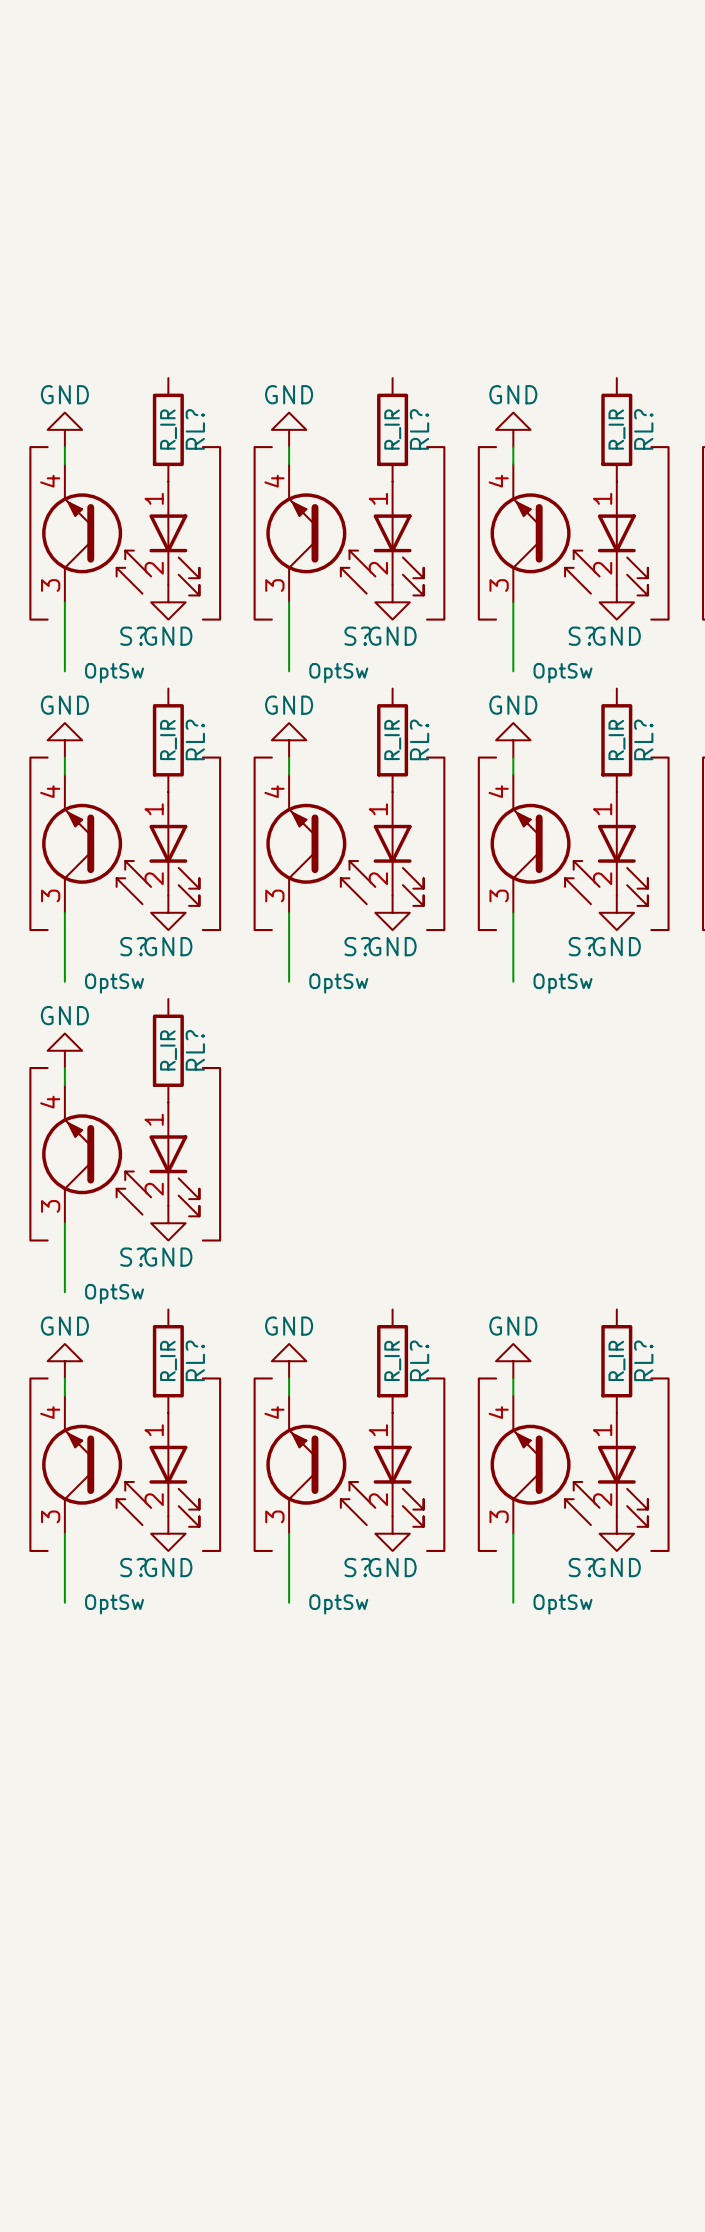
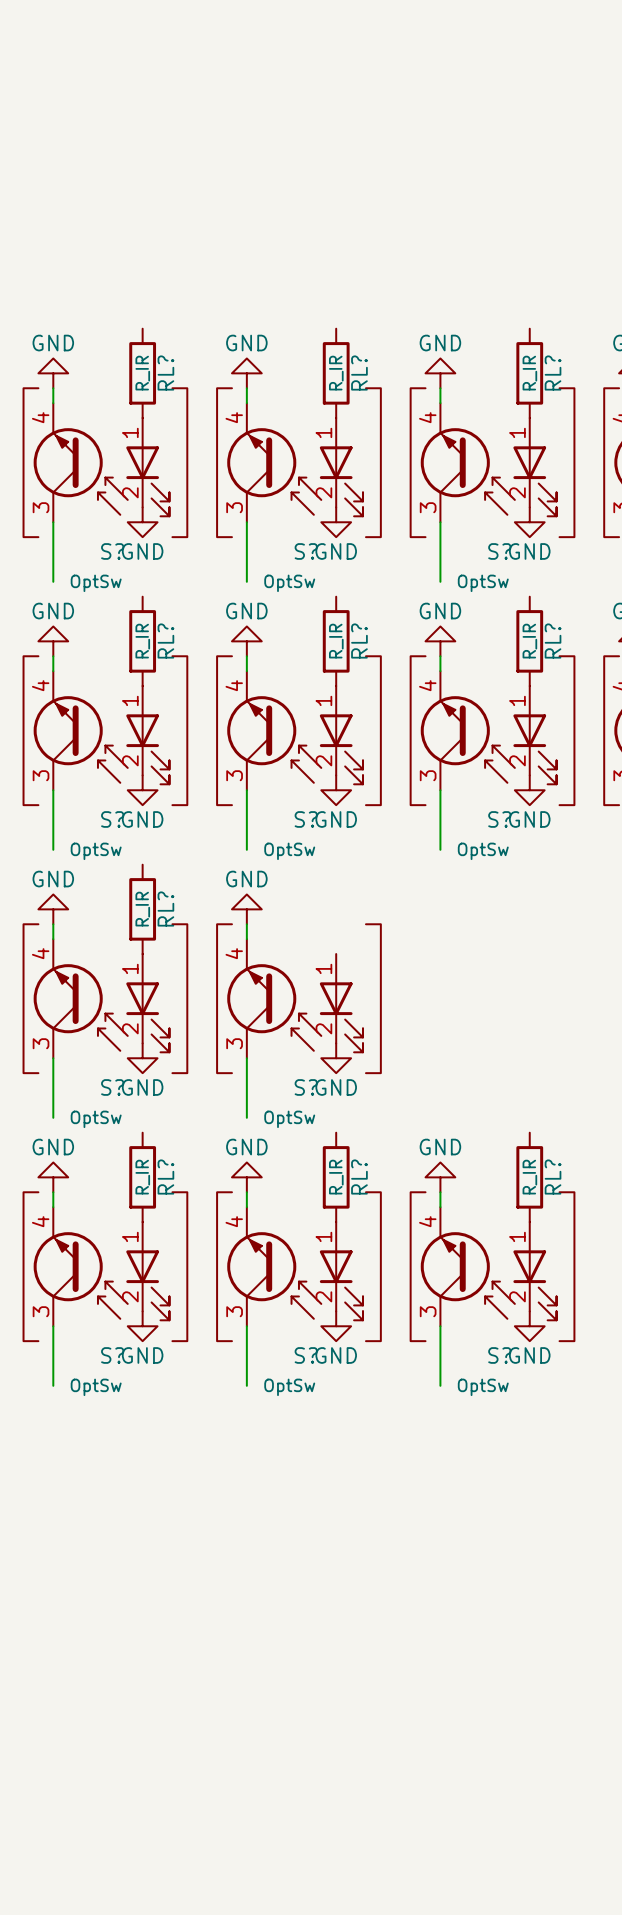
power symbol: none -> GND (246, 909)
wire: none -> (246, 924) (246, 939)
S?: none -> OptSw (298, 998)
wire: none -> (246, 1058) (246, 1117)
power symbol: none -> GND (336, 1058)

